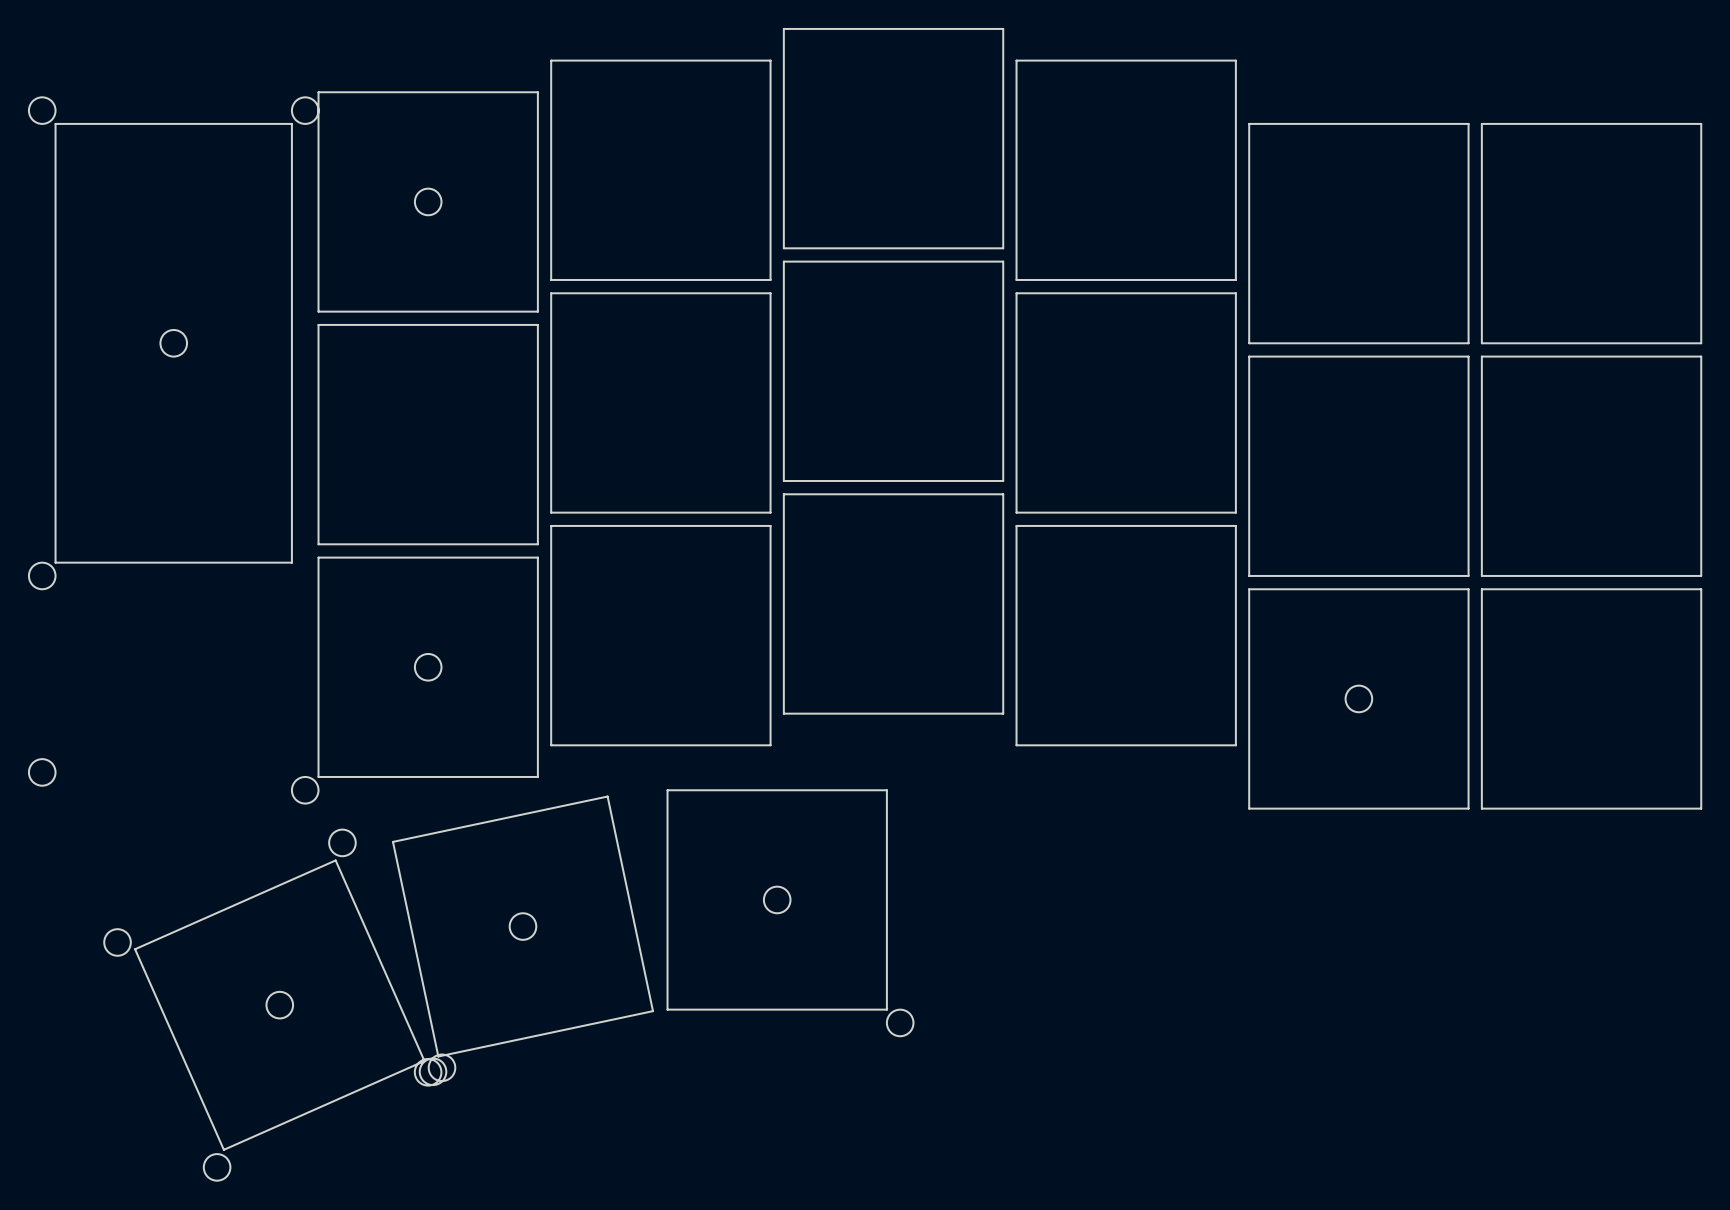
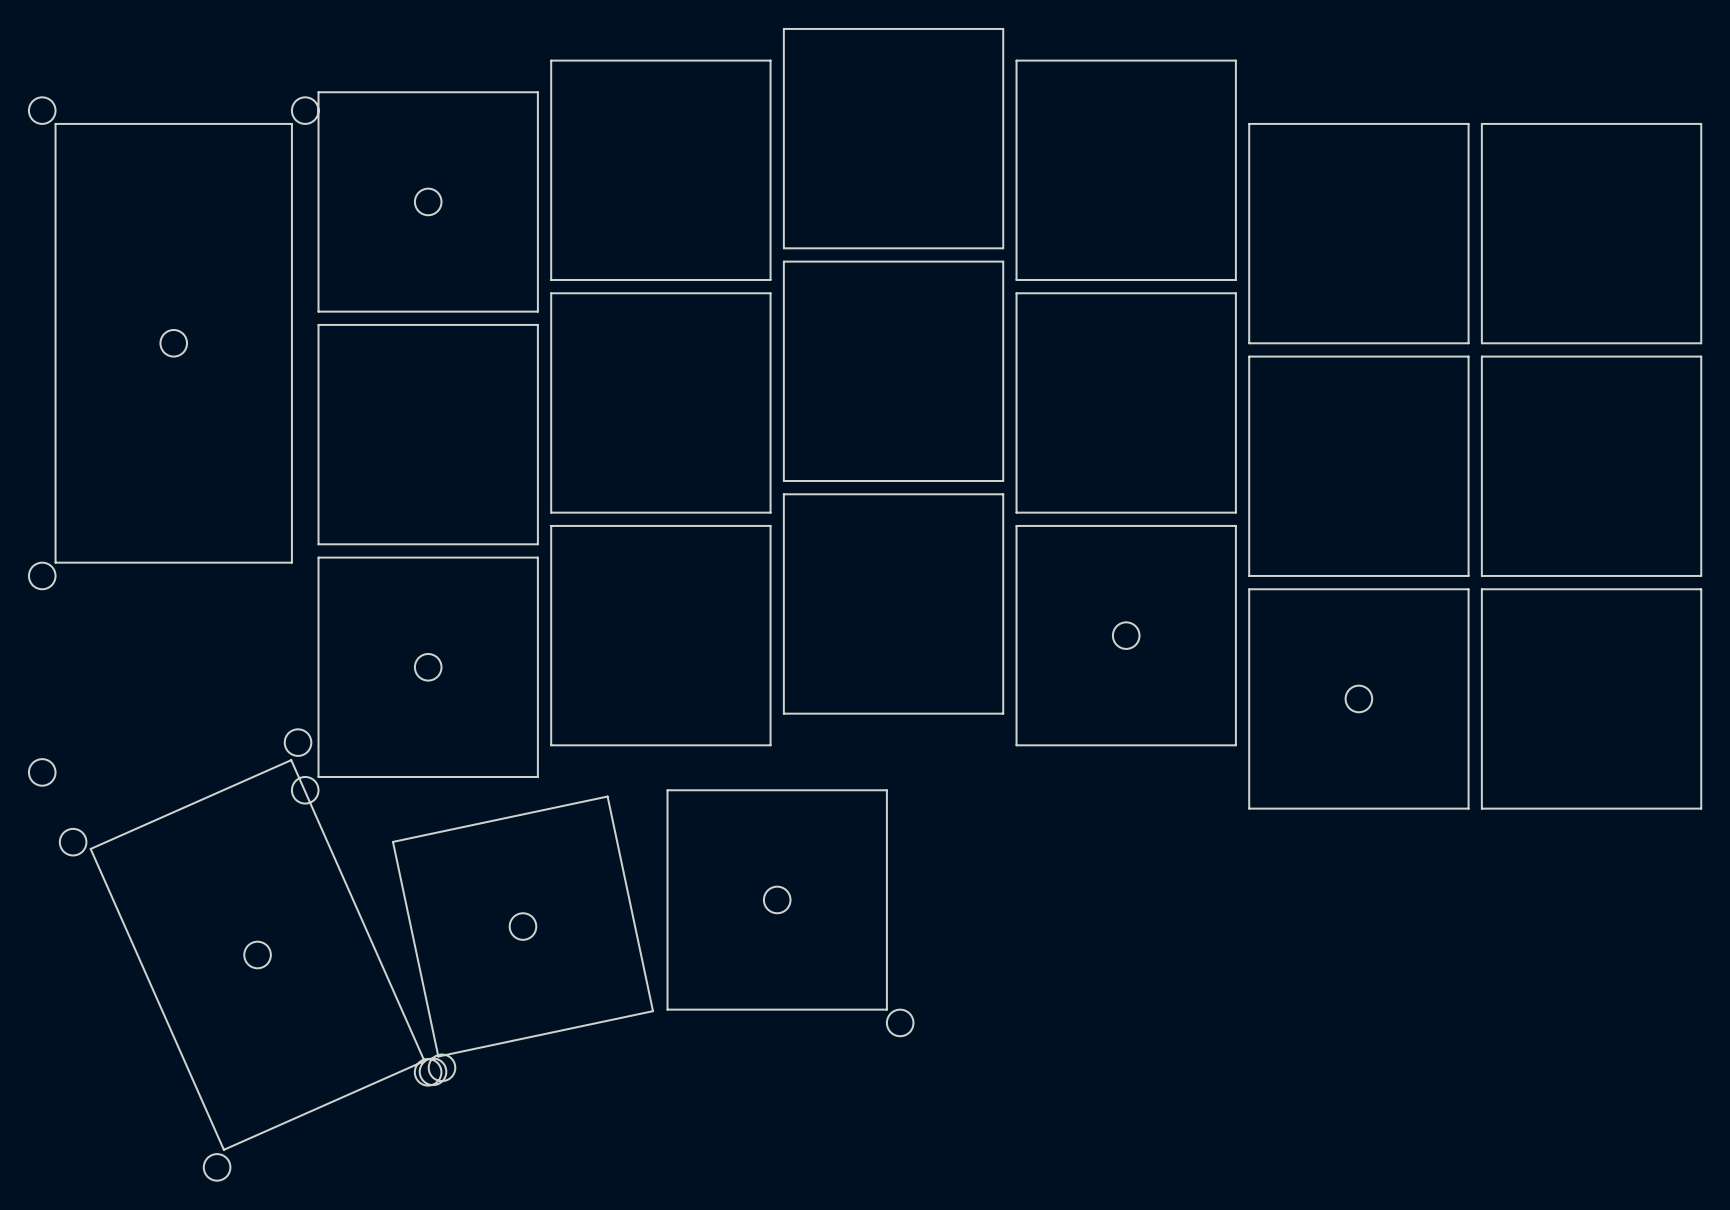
round board edge: none -> [1111, 621, 1141, 650]
round board edge: none -> [283, 728, 313, 757]
round board edge: none -> [58, 827, 88, 857]
round board edge: [328, 828, 357, 858] -> none
board edge: (335, 860) (135, 949) -> (335, 860) (291, 760) (90, 848) (135, 949)
round board edge: [103, 928, 132, 957] -> none
round board edge position: (279, 1005) -> (257, 954)

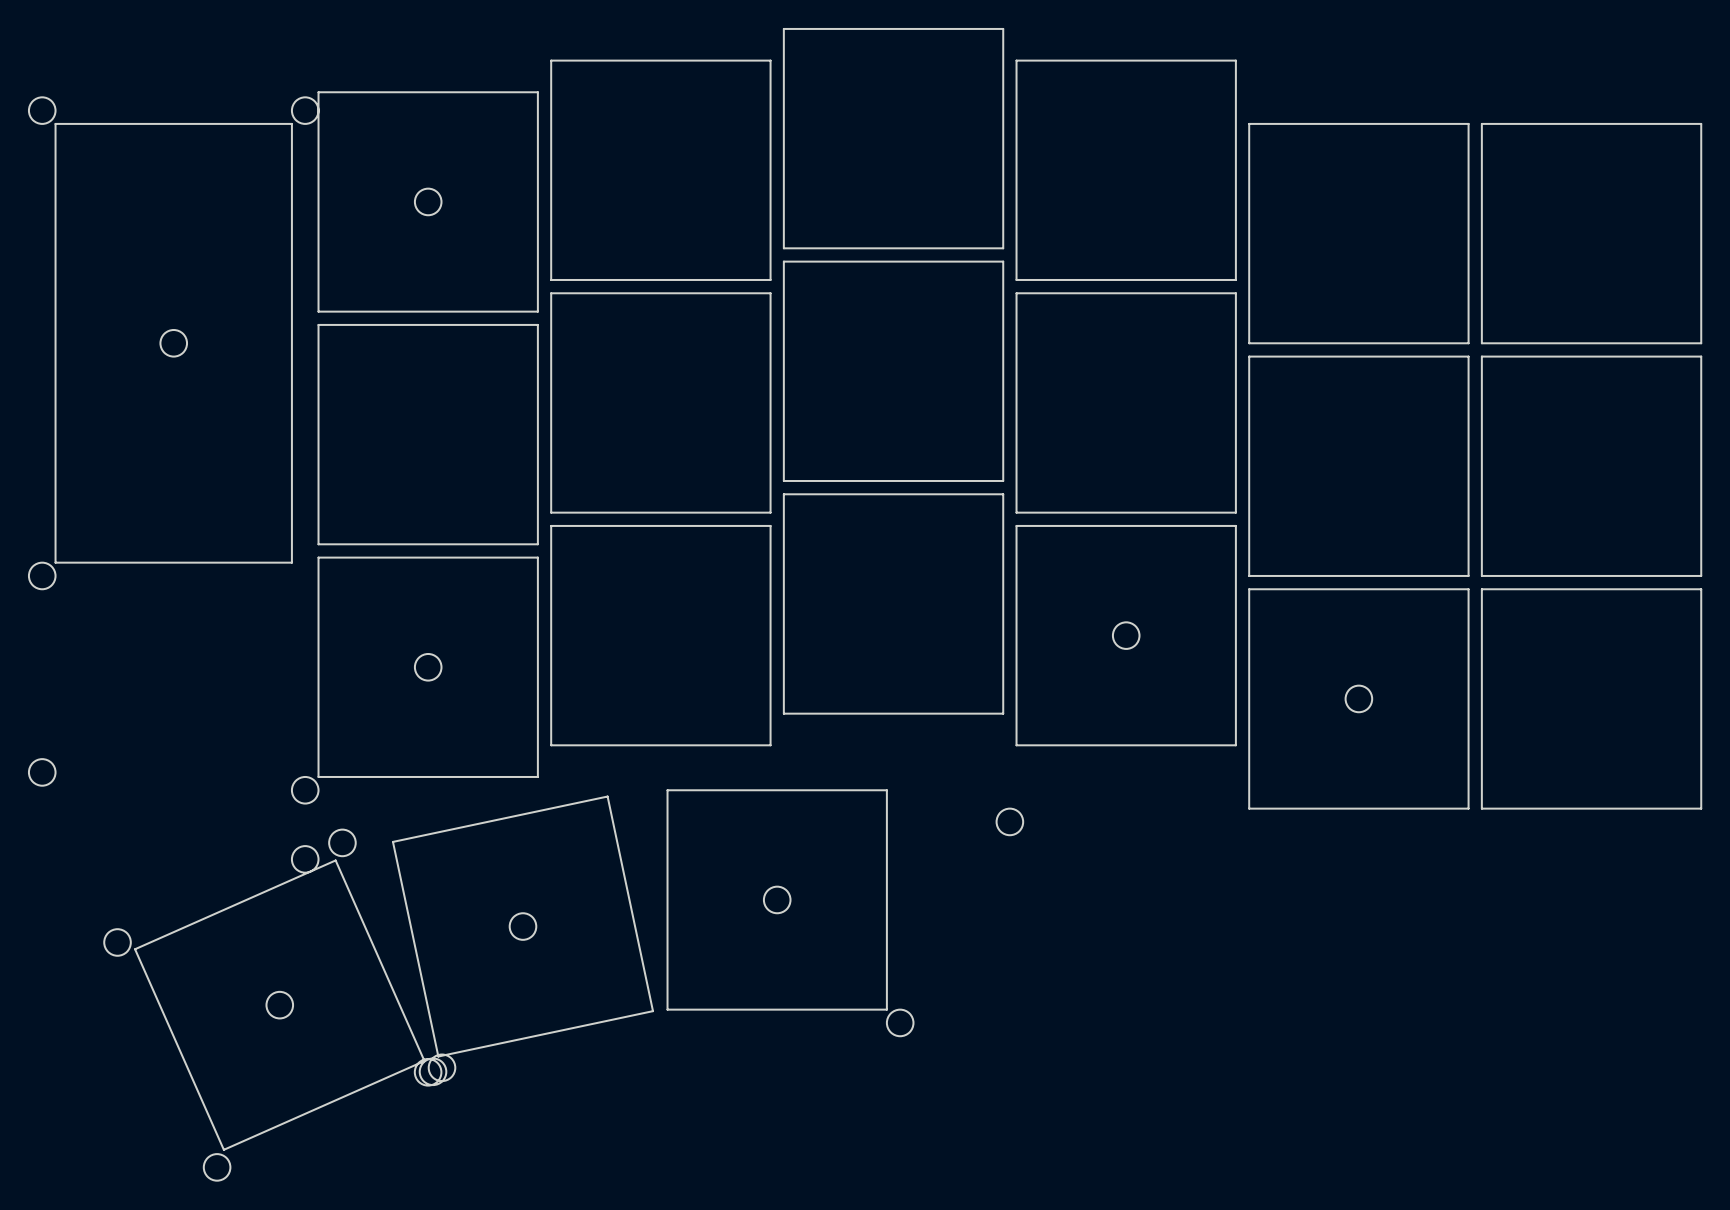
round board edge: [283, 728, 313, 757] -> none
round board edge: none -> [995, 807, 1025, 837]
round board edge: [58, 827, 88, 857] -> none
round board edge: none -> [328, 828, 357, 858]
round board edge: none -> [290, 845, 320, 874]
board edge: (335, 860) (291, 760) (90, 848) (135, 949) -> (335, 860) (135, 949)
round board edge: none -> [103, 928, 132, 957]
round board edge: [243, 940, 272, 970] -> none
round board edge: none -> [265, 990, 295, 1020]

